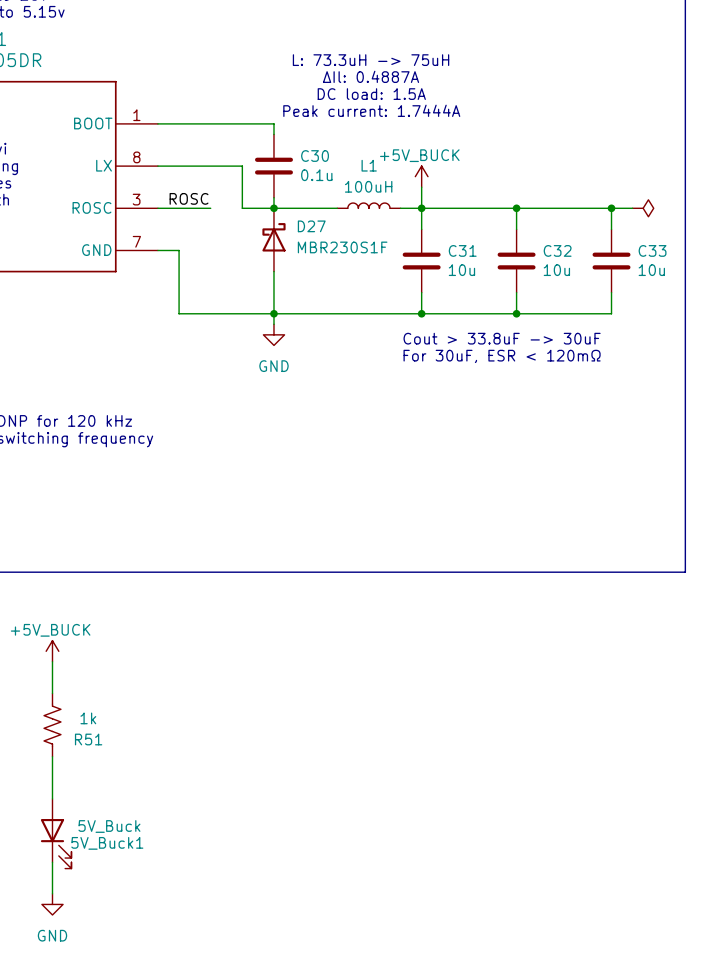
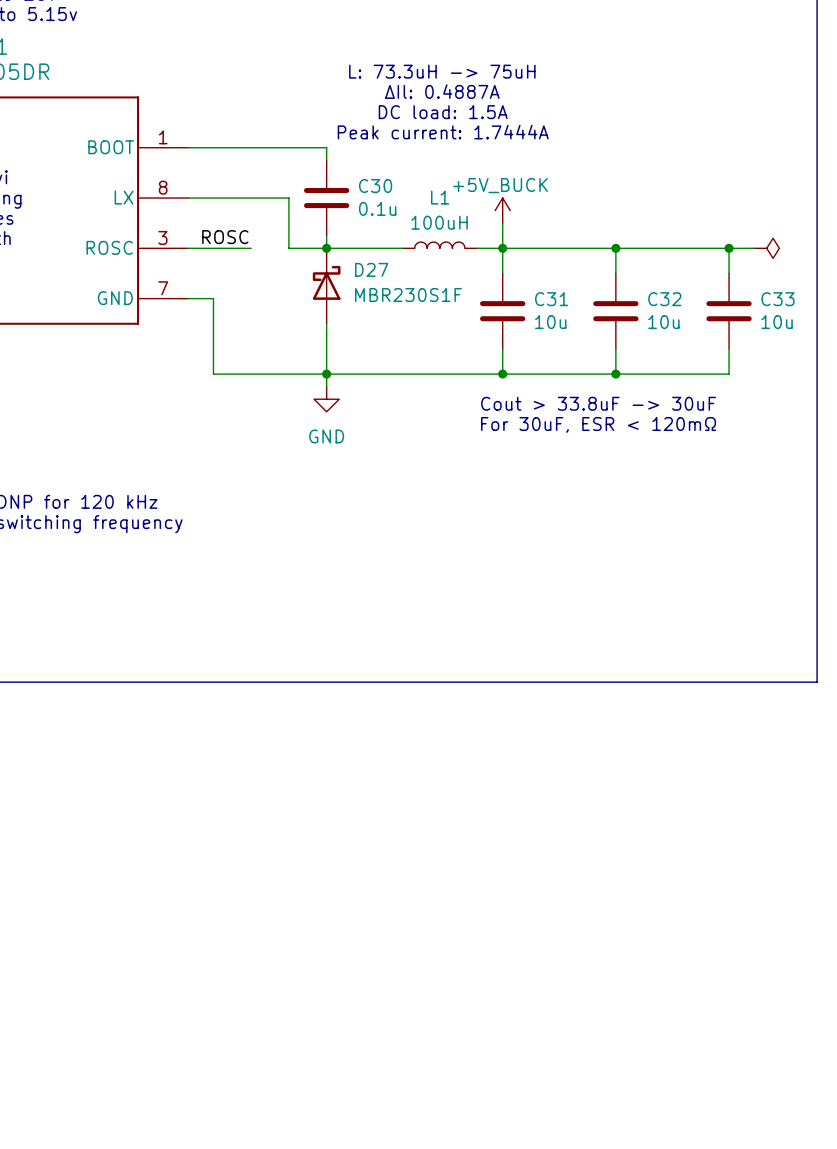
power symbol: +5V_BUCK (52, 651) -> none
wire: (52, 661) (52, 693) -> none
R51: 1k (52, 725) -> none
wire: (52, 756) (52, 798) -> none
5V_Buck1: 5V_Buck (56, 833) -> none
wire: (52, 862) (52, 893) -> none
power symbol: GND (52, 904) -> none

